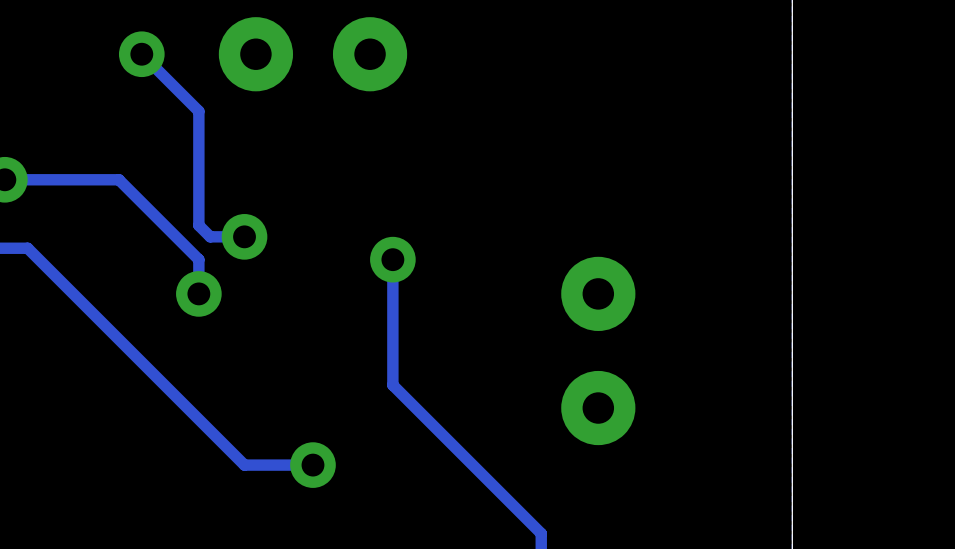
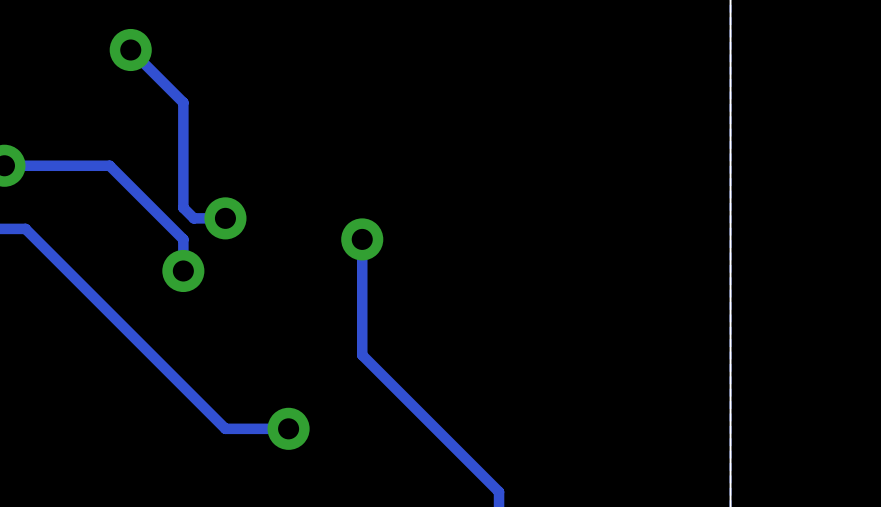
part: (312, 54) -> none
part: (598, 350) -> none

